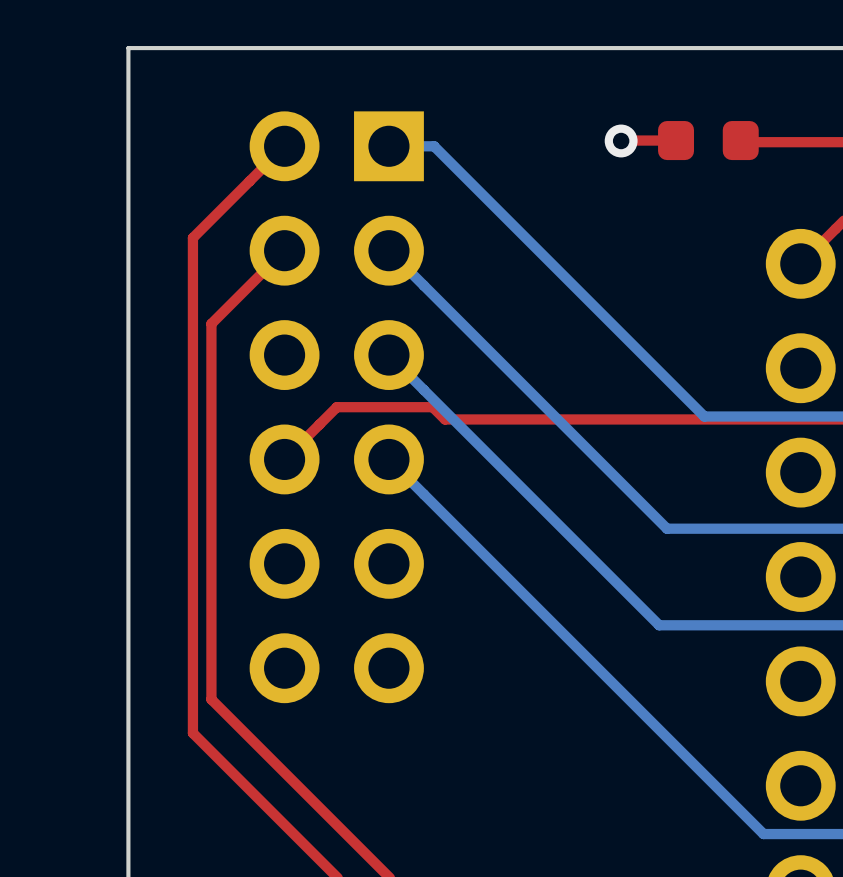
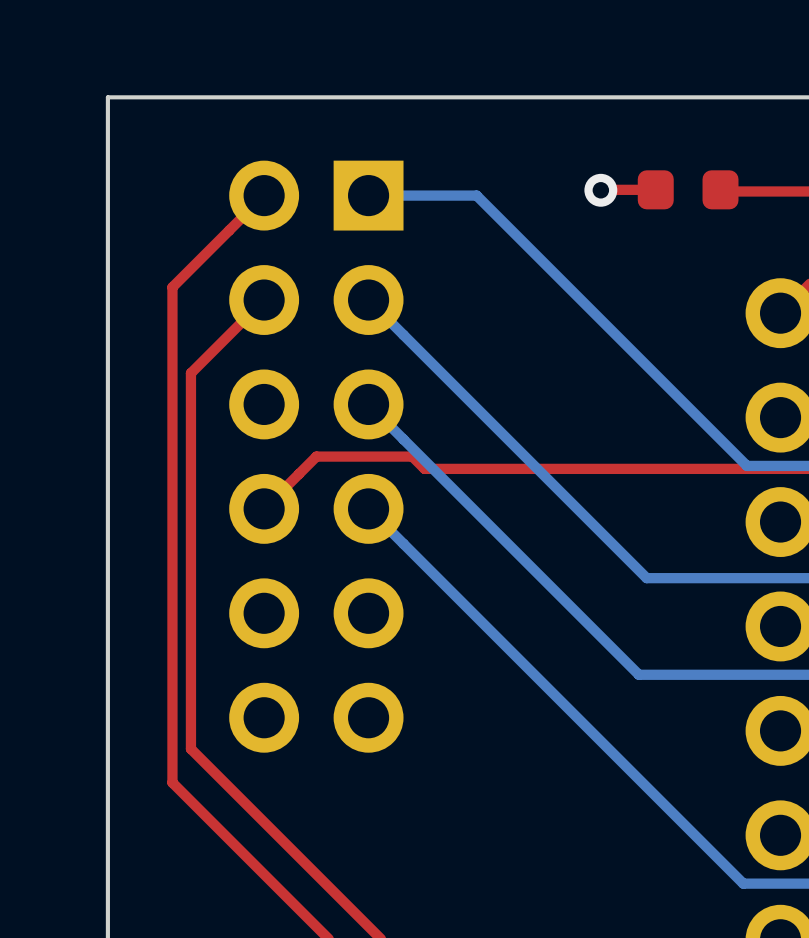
bottom track: (434, 146) (704, 416) (767, 416) -> (413, 195) (476, 195) (746, 465)

